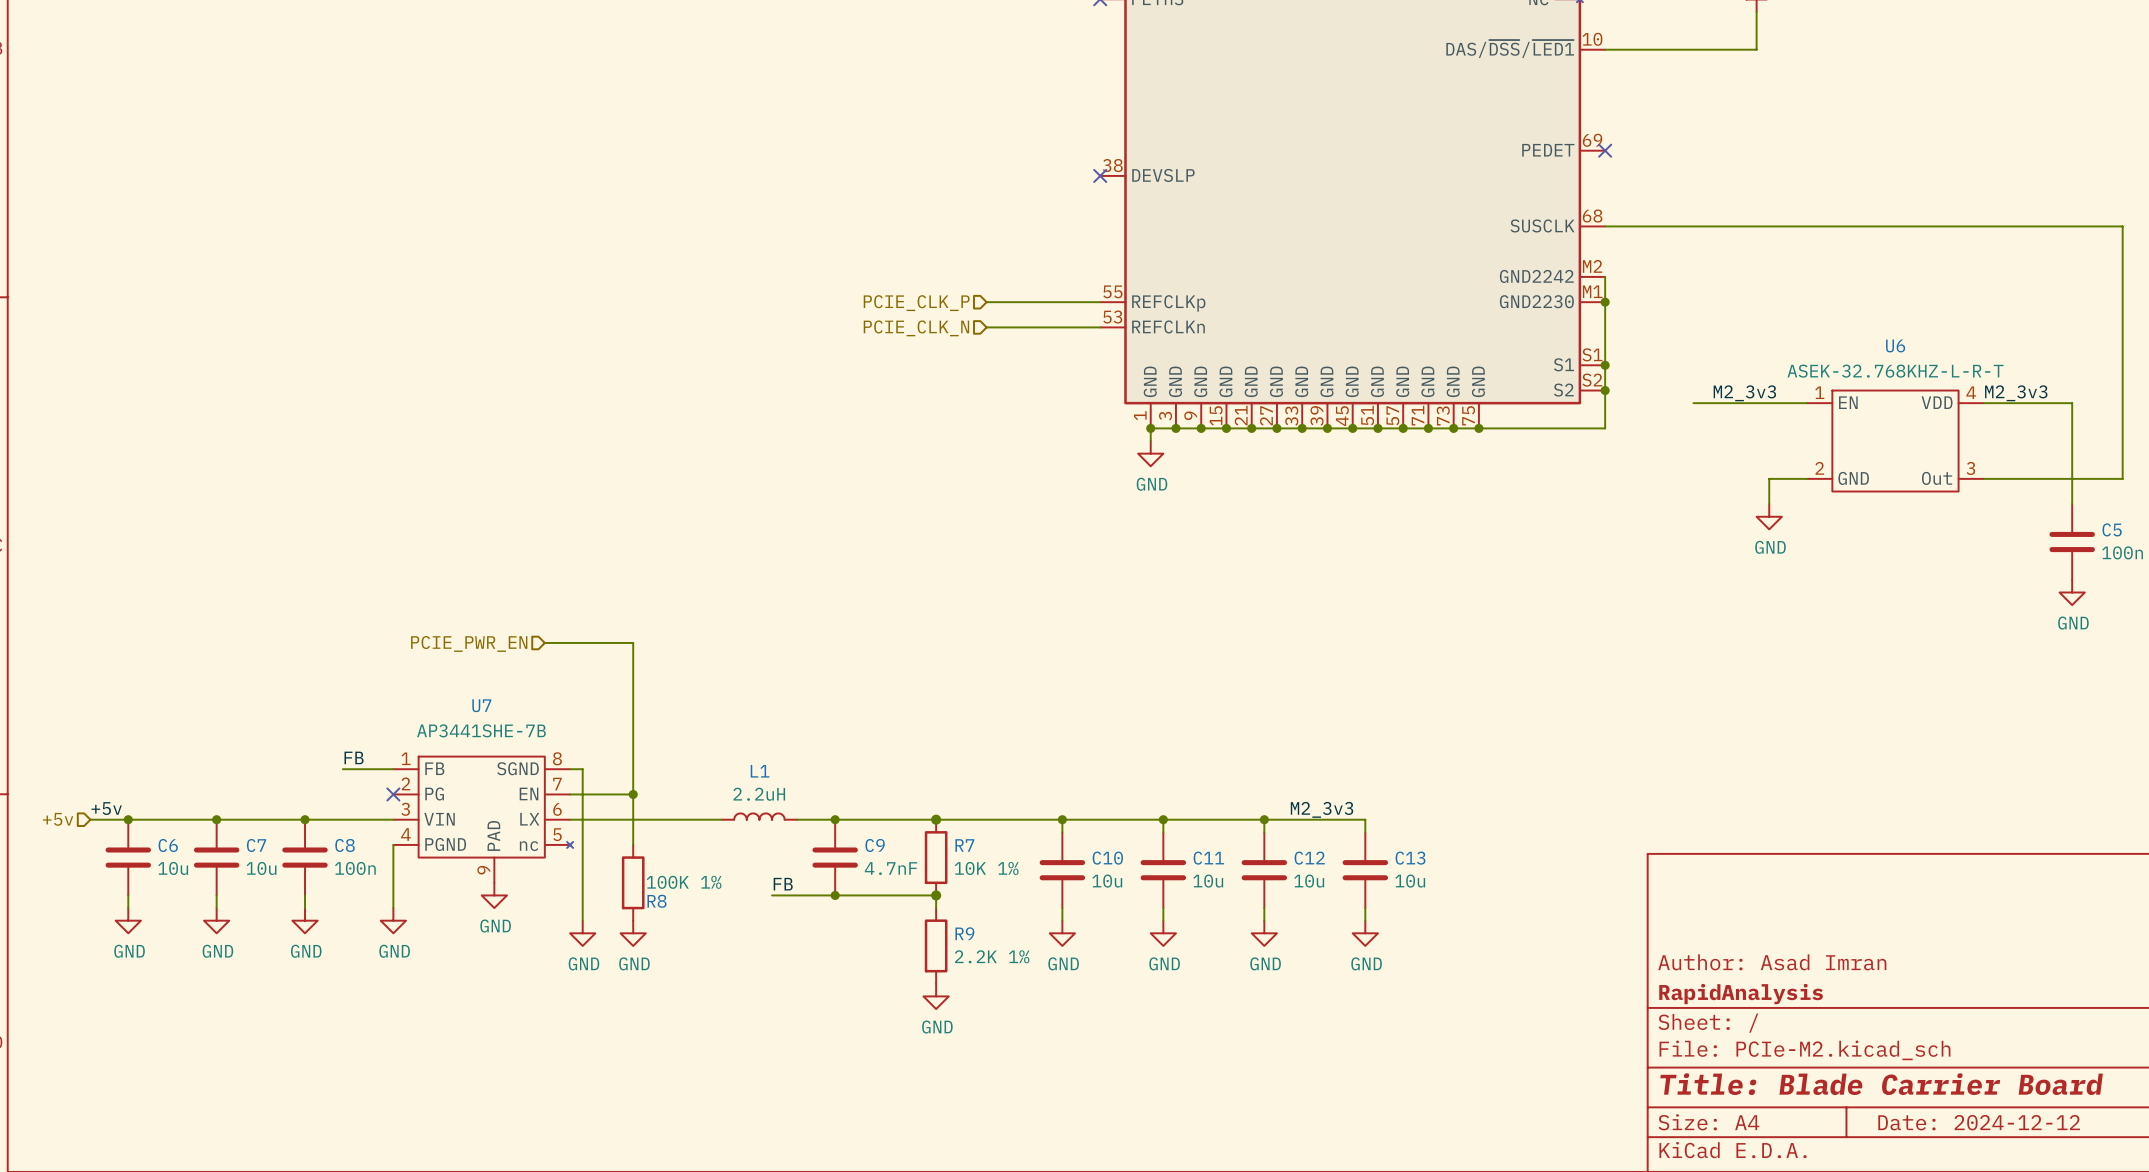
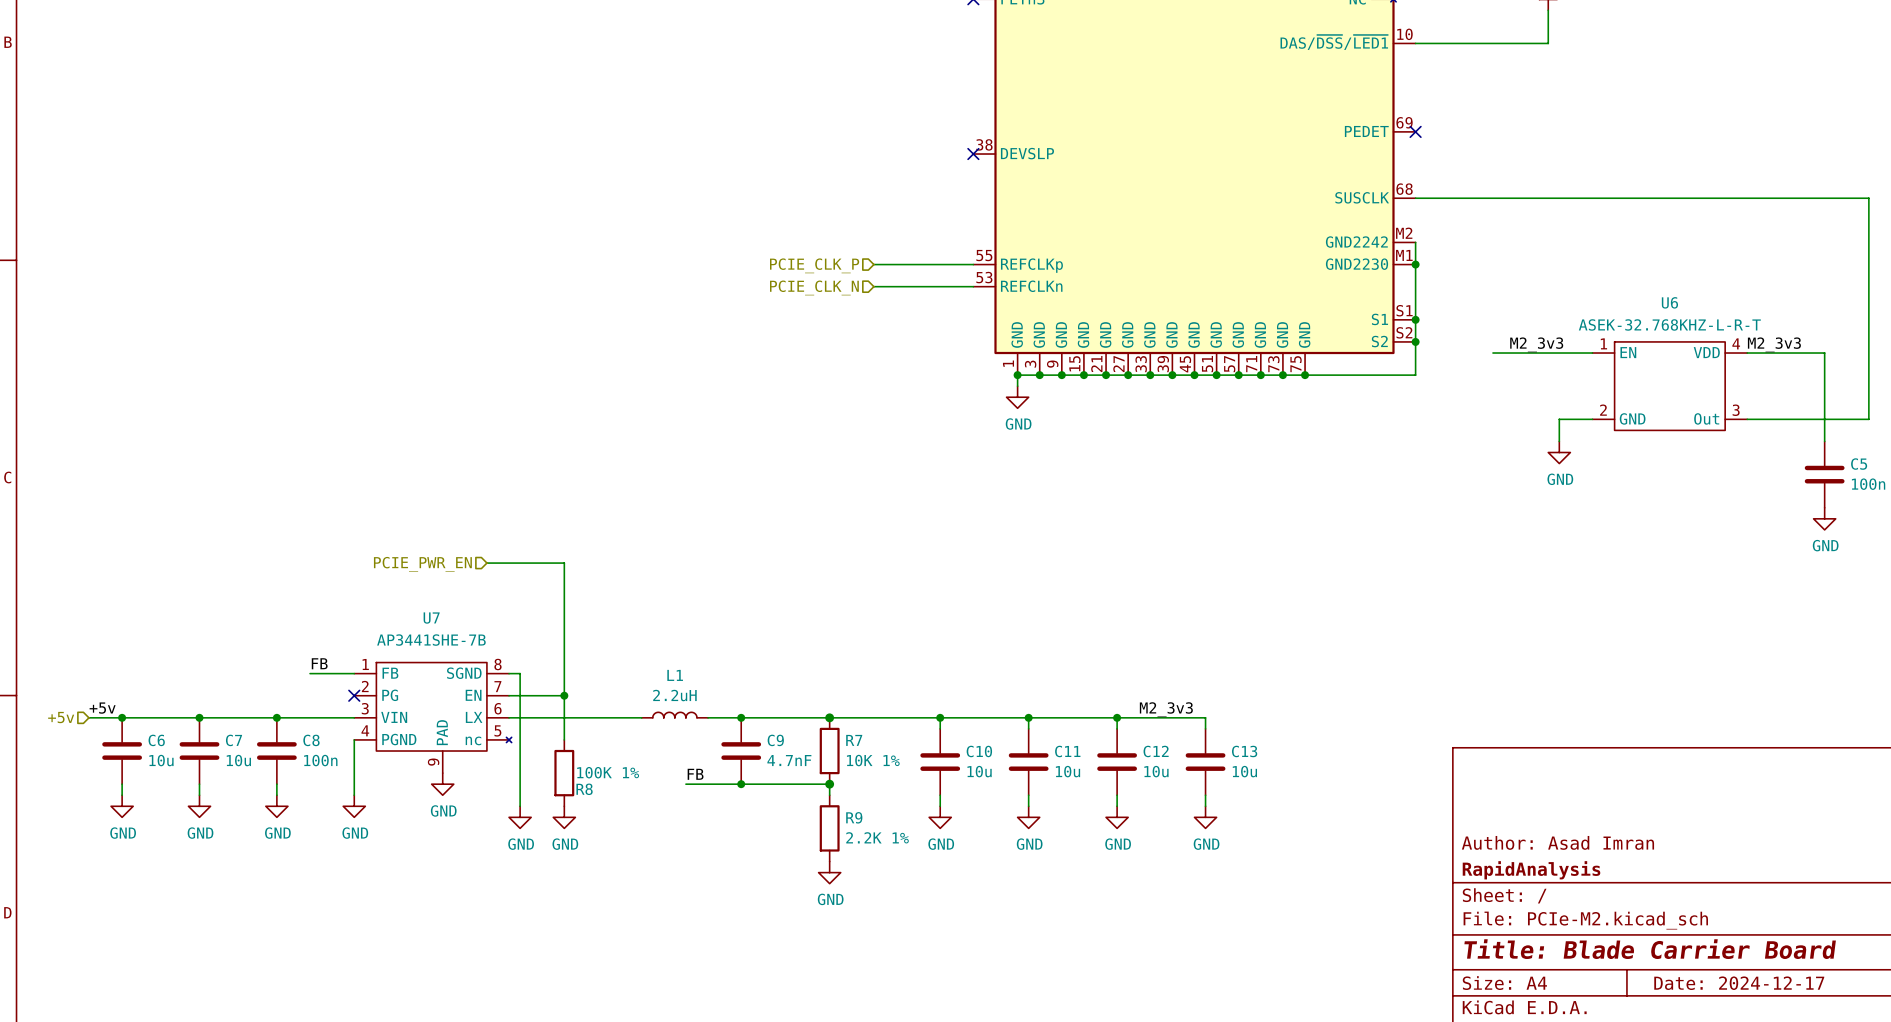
title block: Date: 2024-12-12 (1979, 1122) -> Date: 2024-12-17 (1739, 983)

